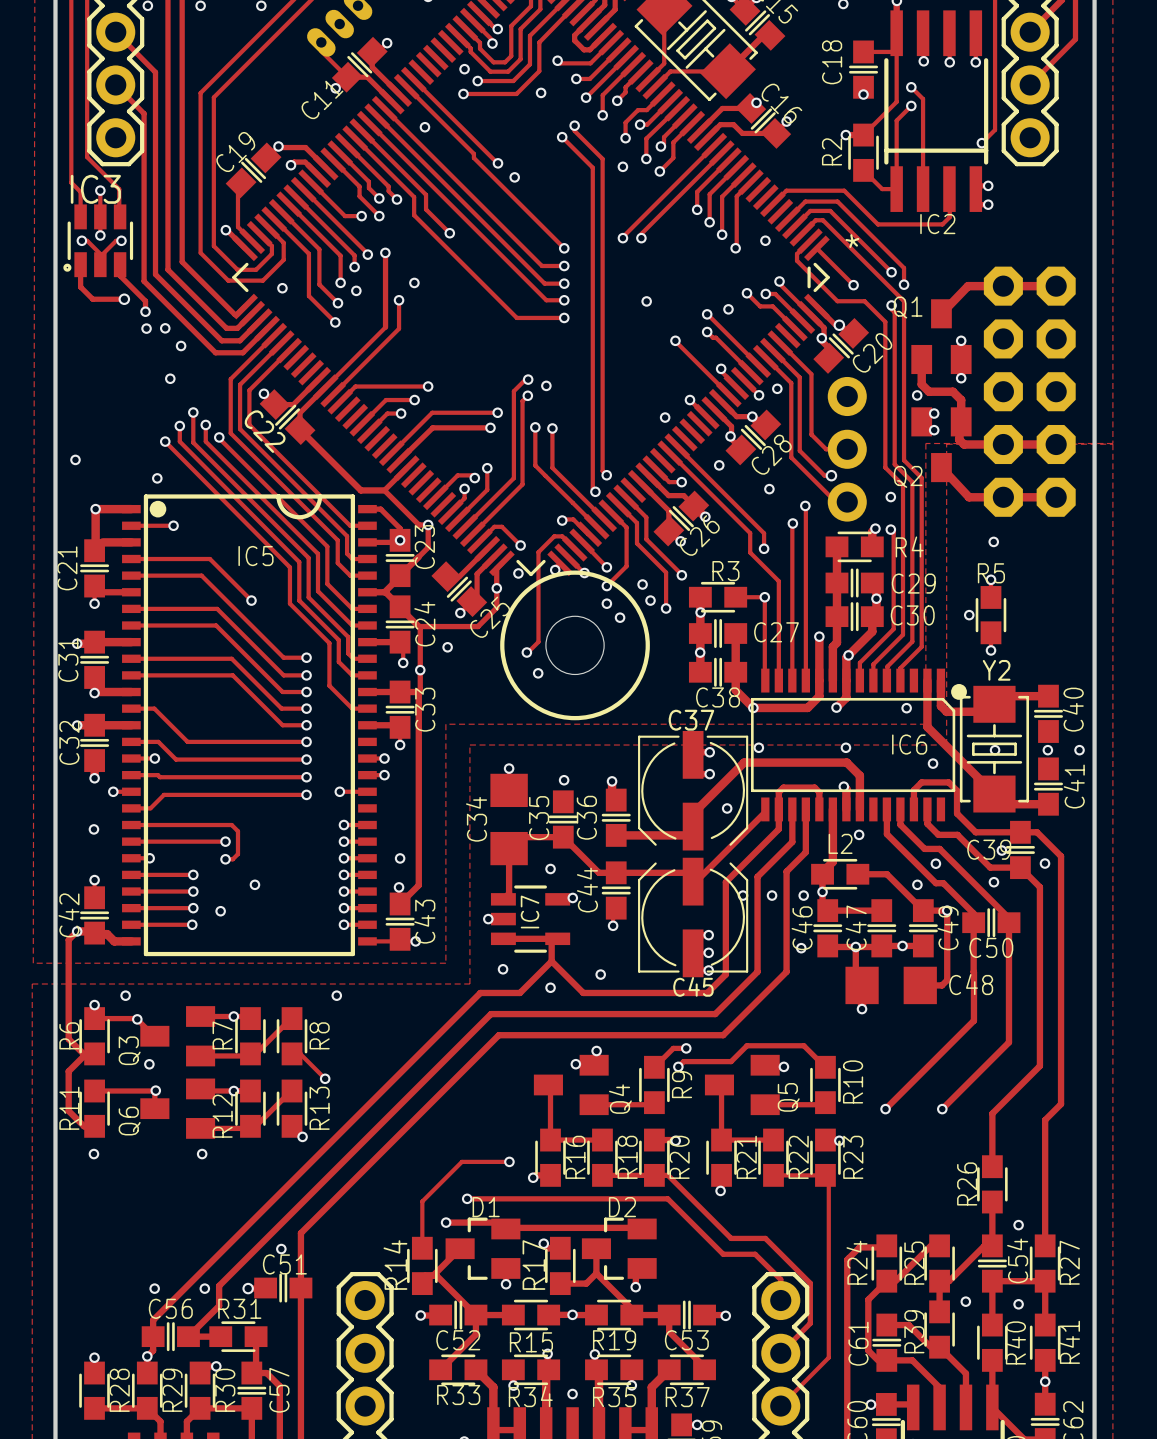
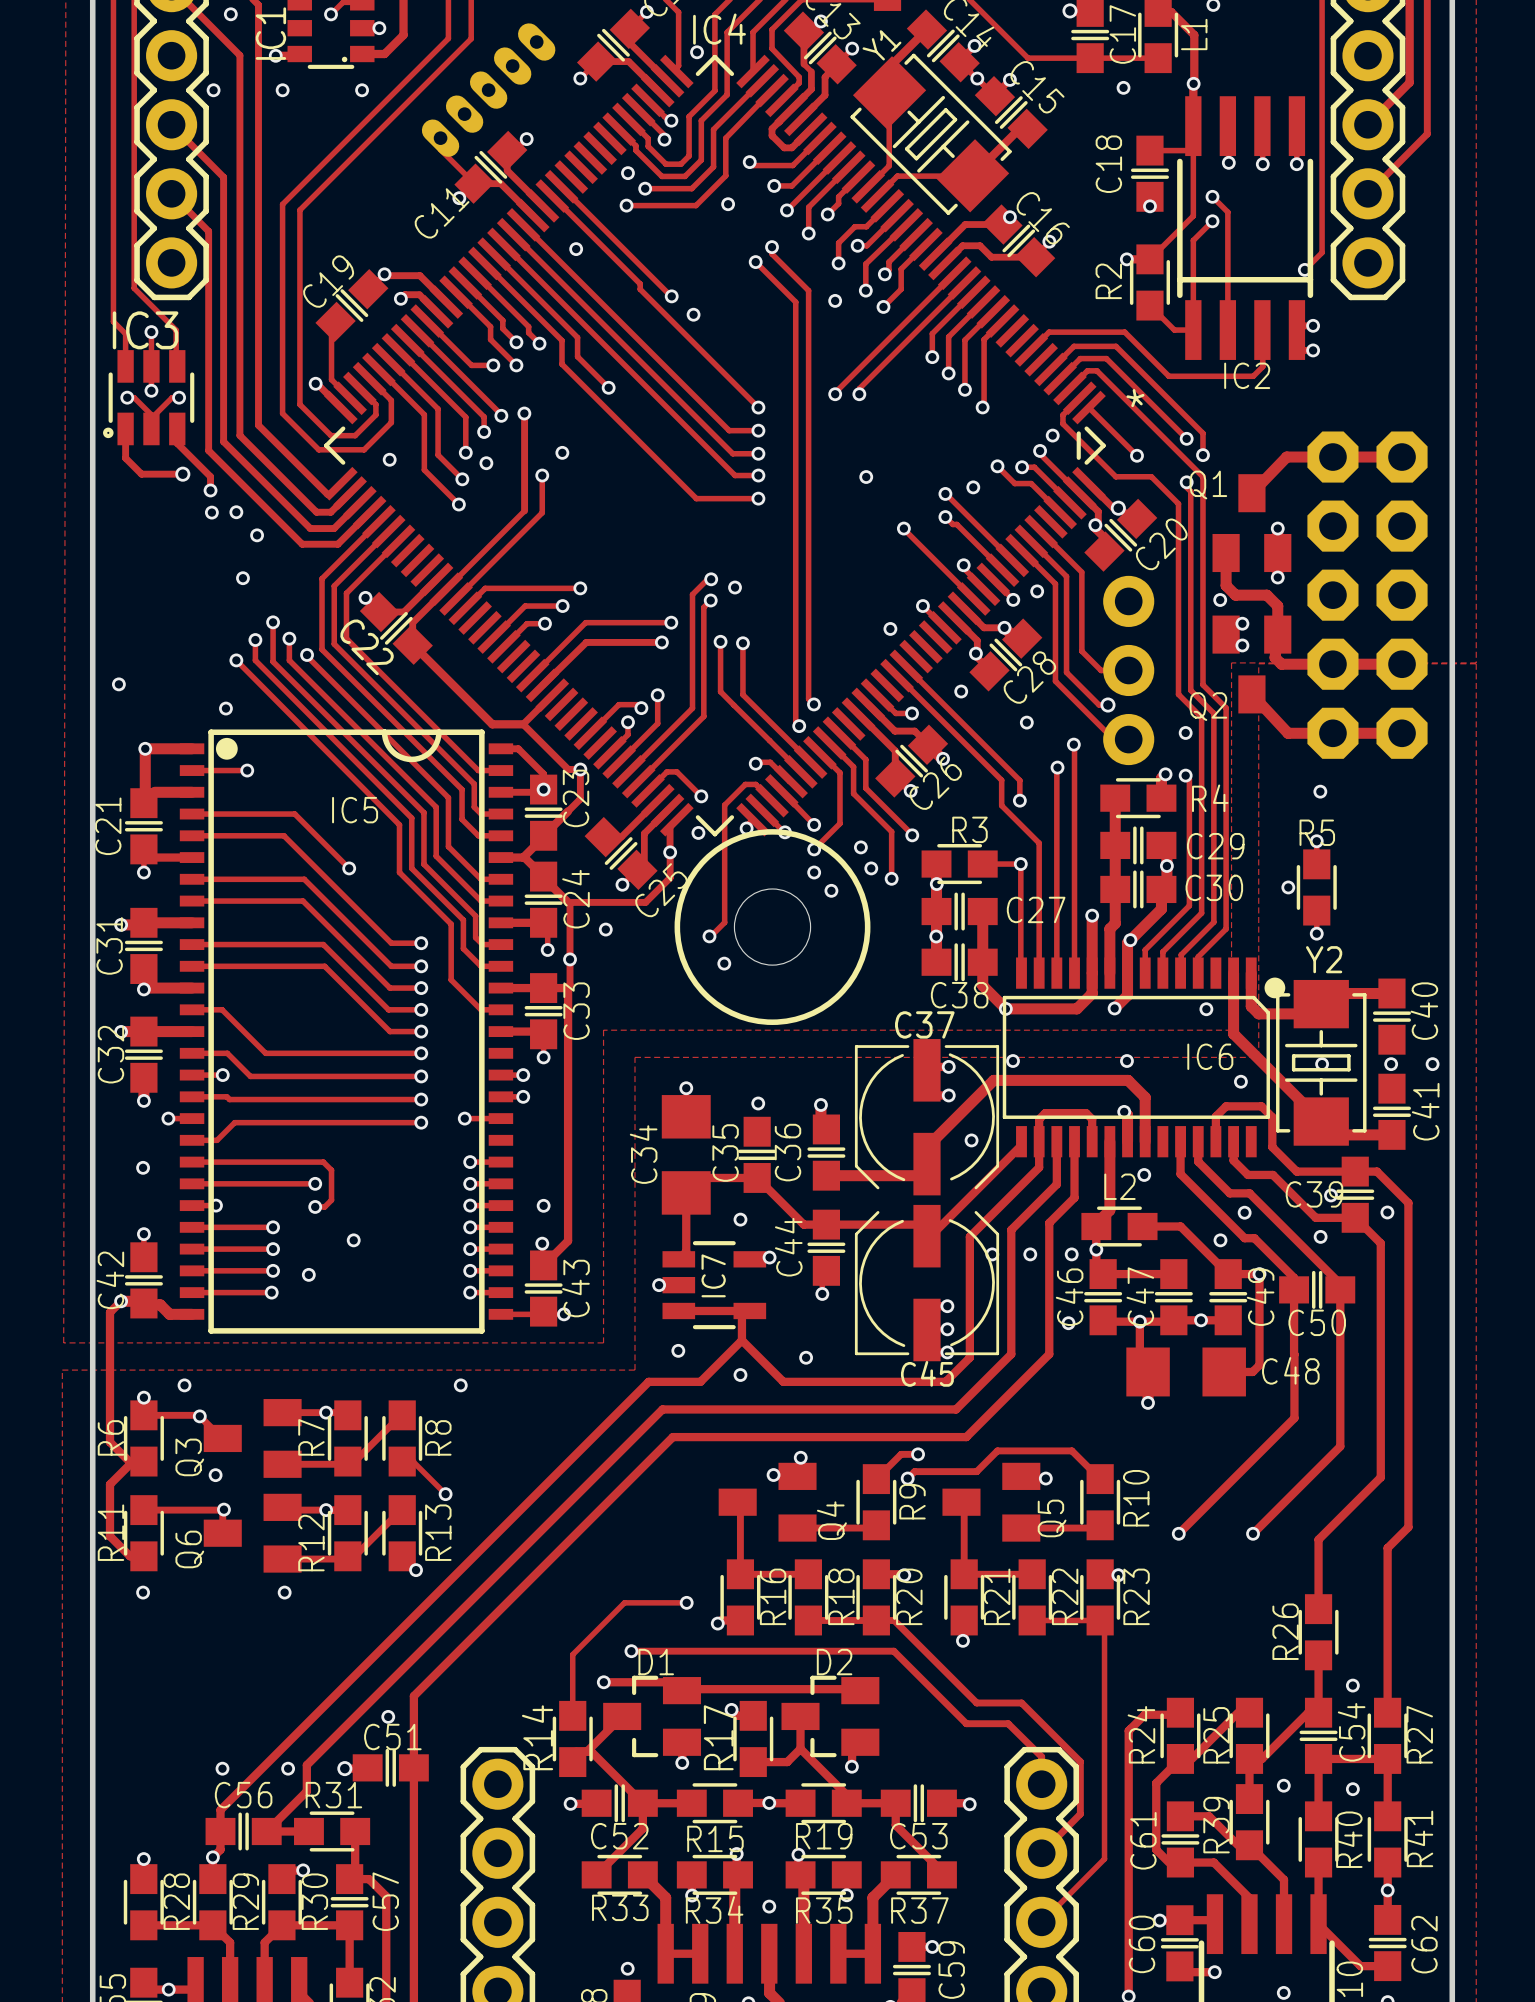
via position: (765, 240) -> (1052, 435)

